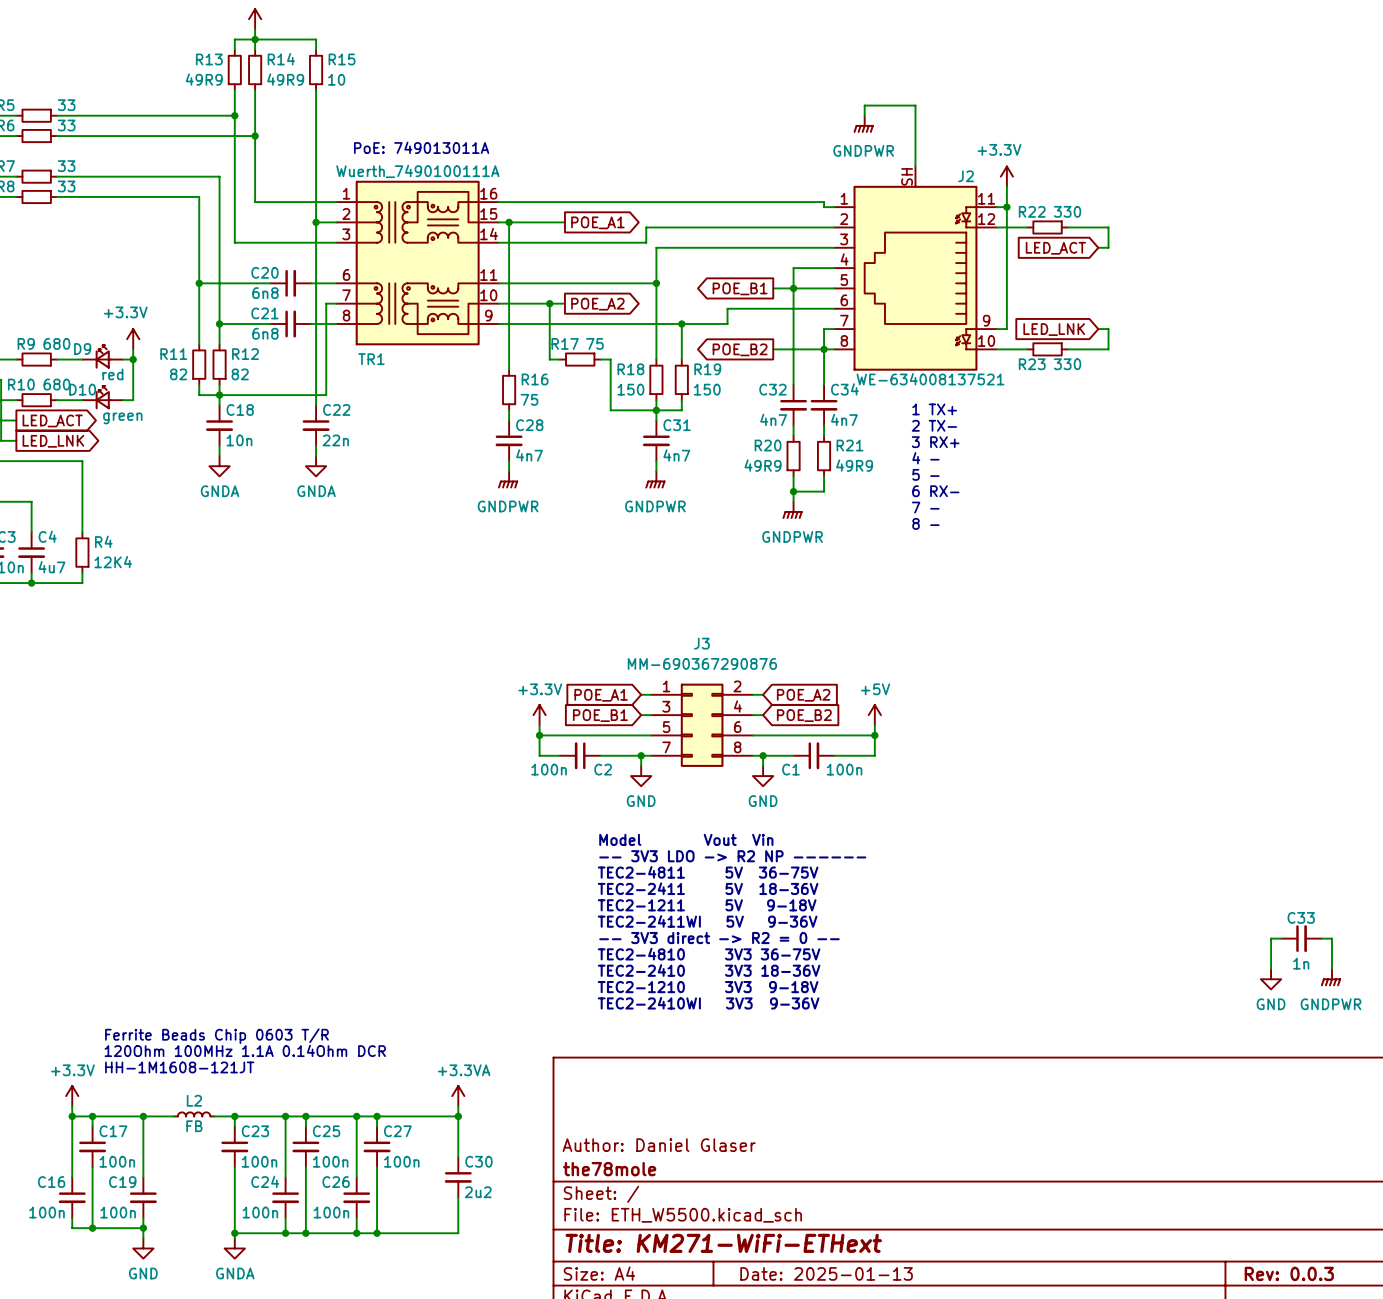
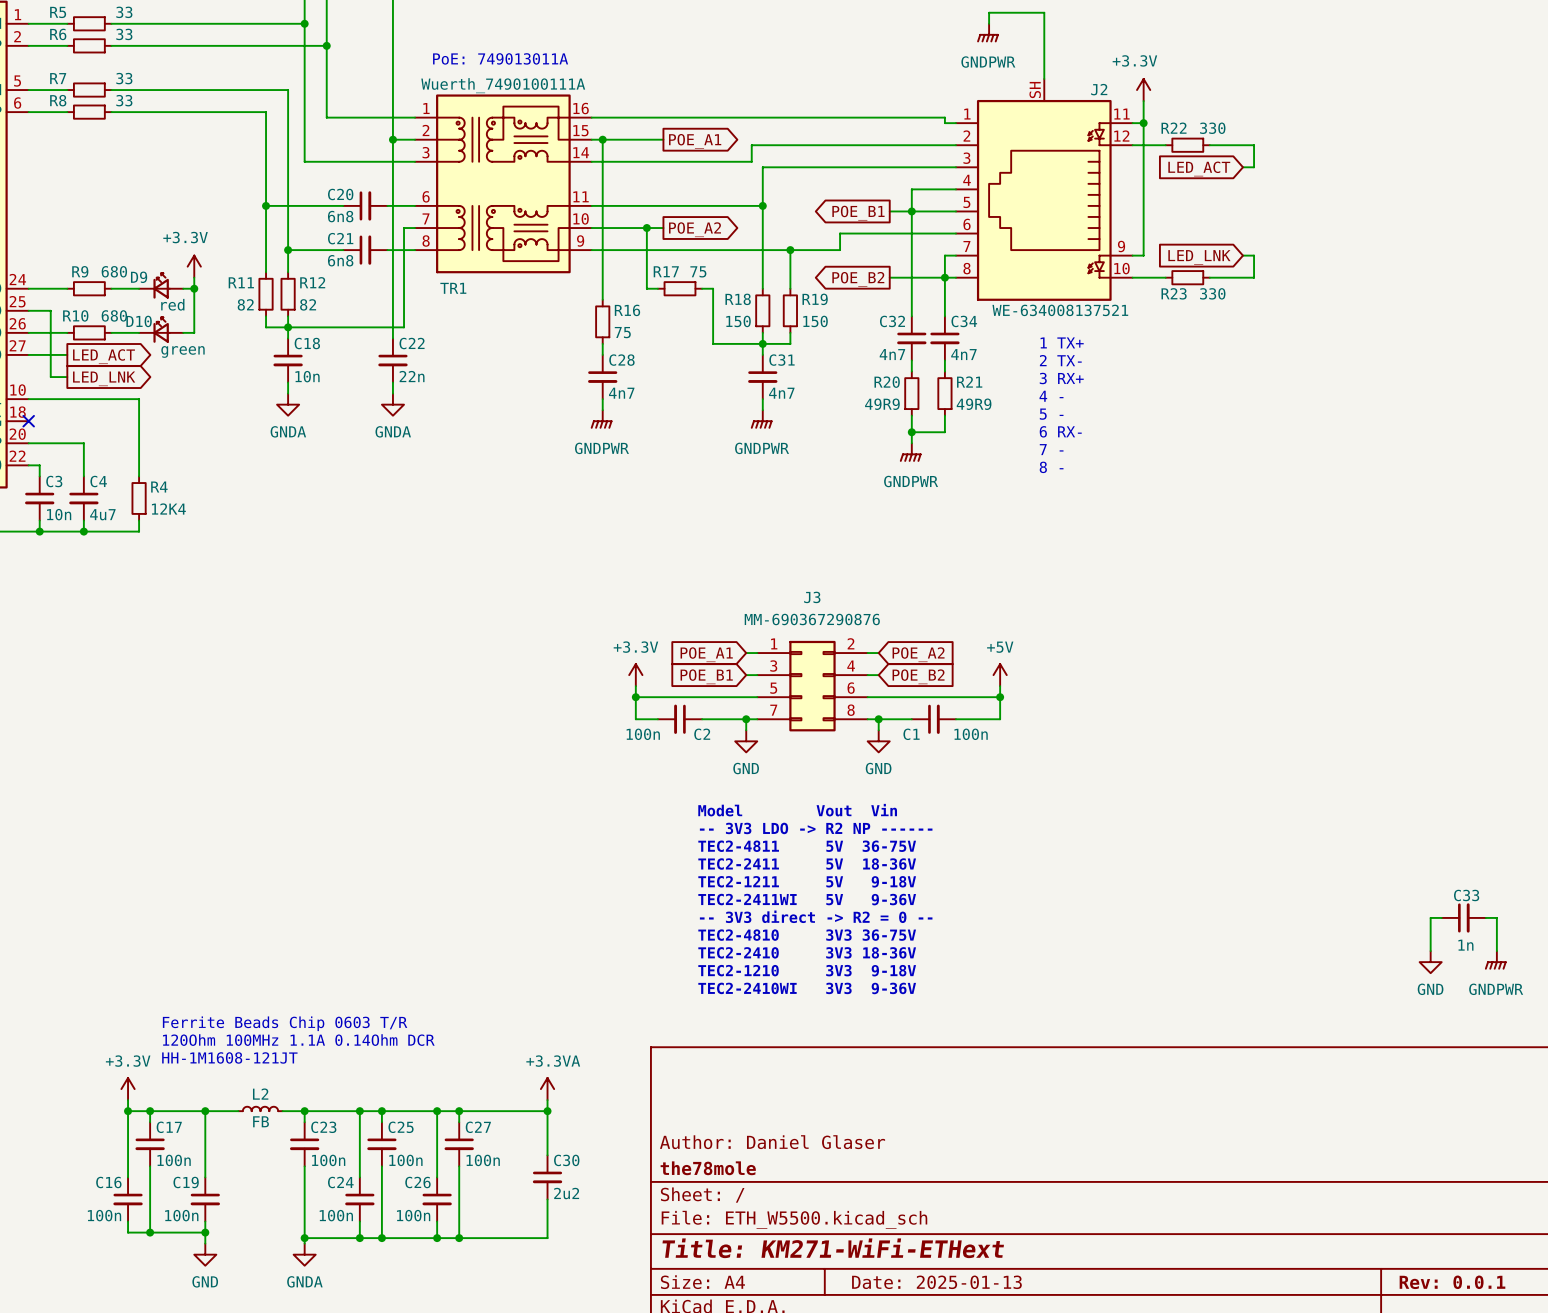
title block: Rev: 0.0.3 (1289, 1273) -> Rev: 0.0.1 (1452, 1282)

